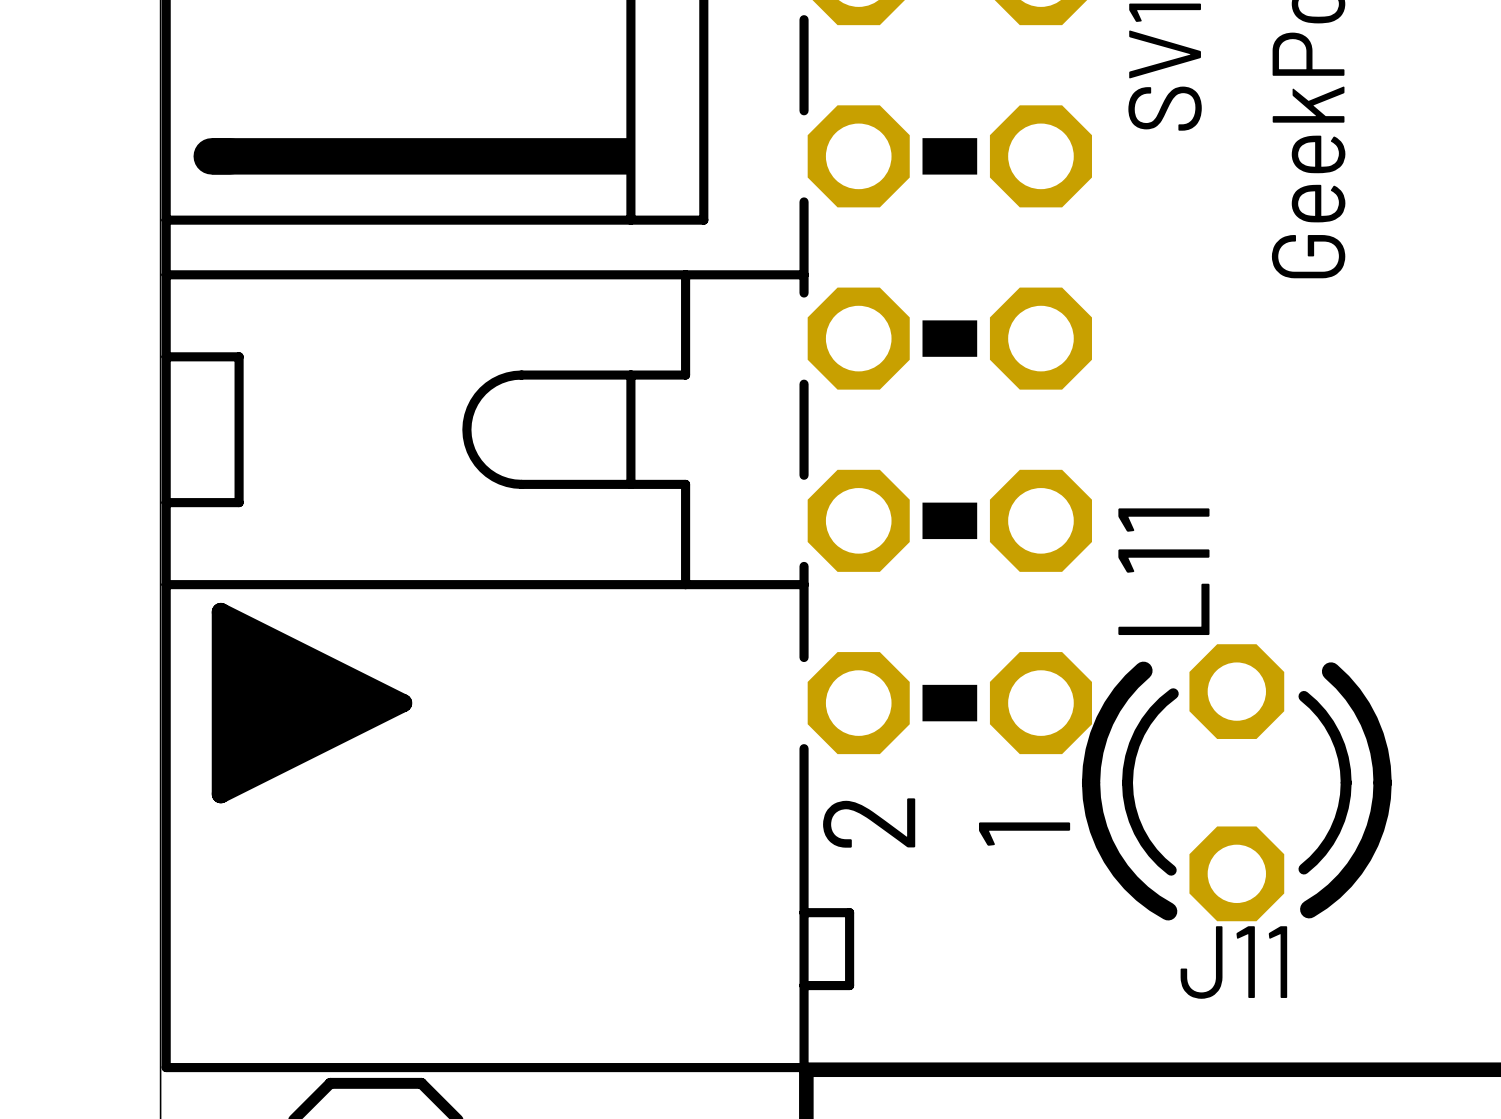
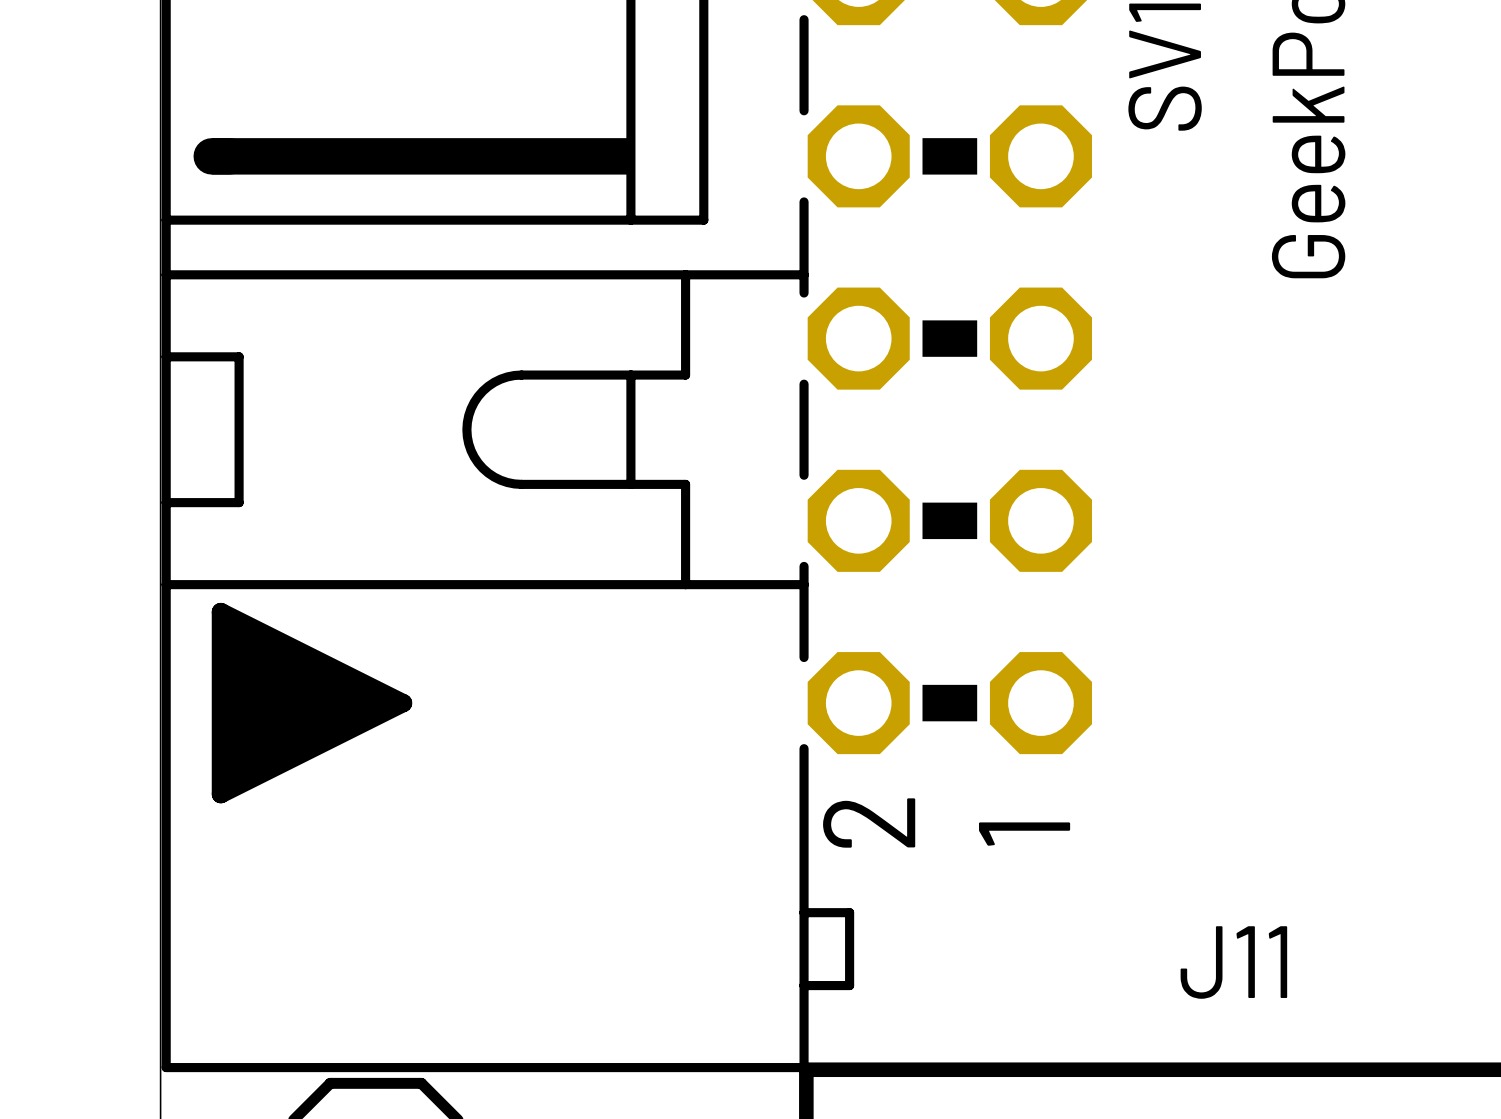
L11: (1236, 782) -> none

